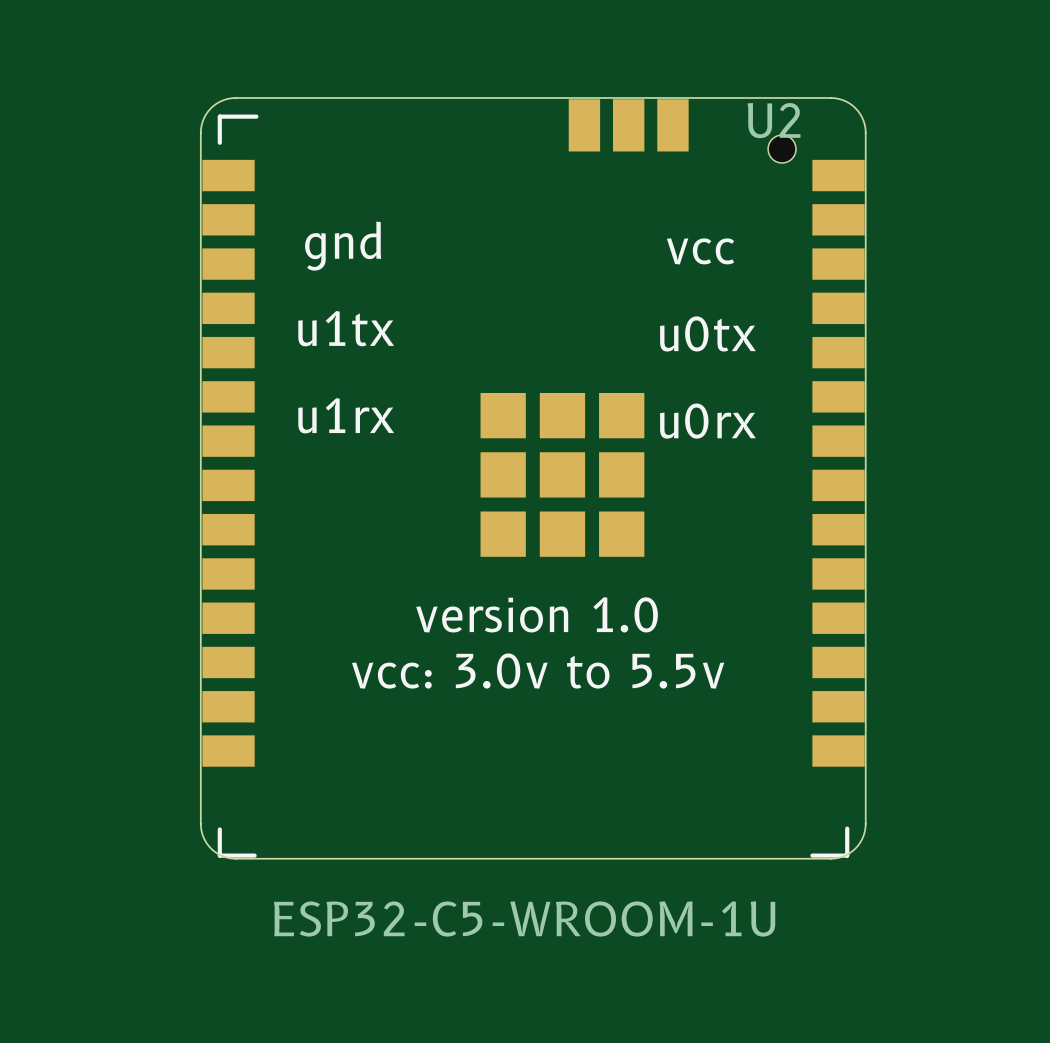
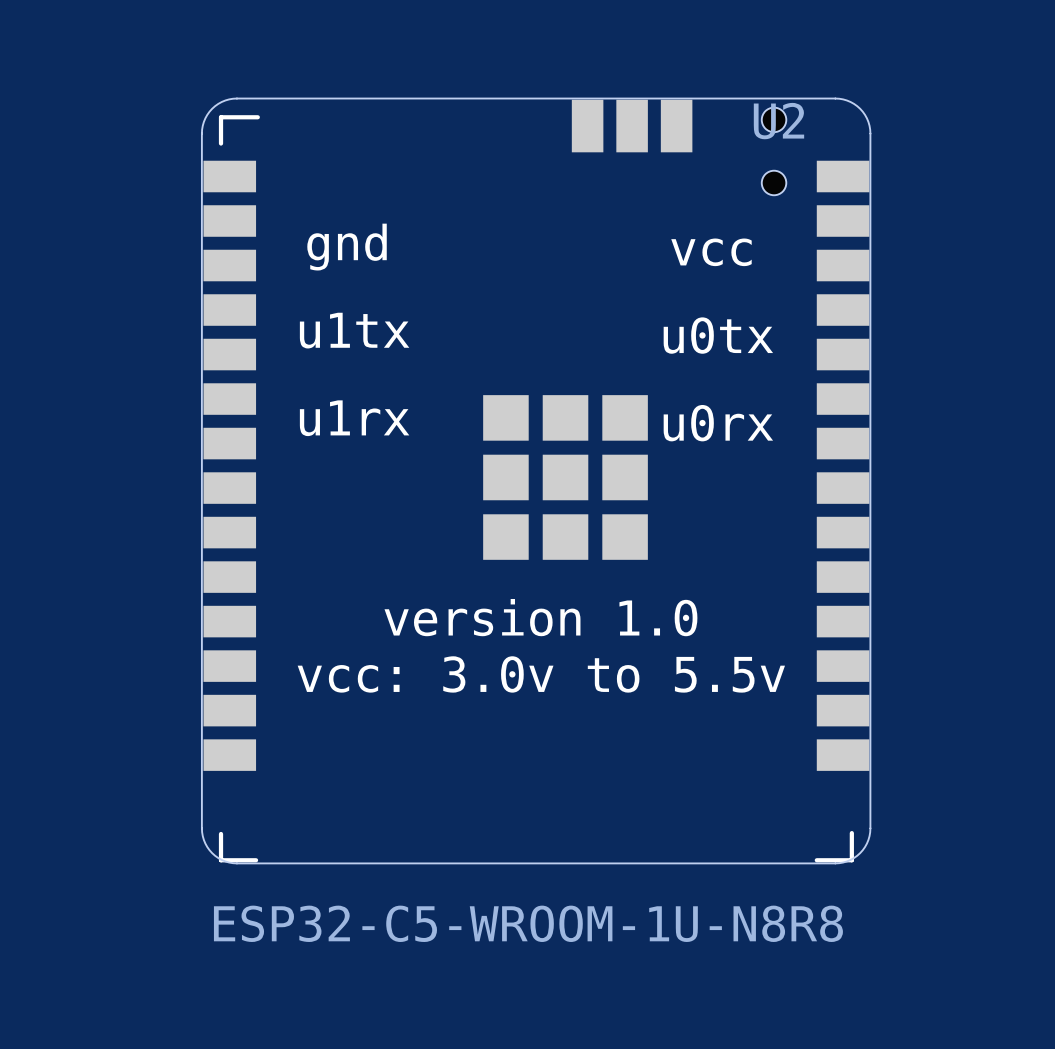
part footprint: [768, 135, 797, 164] -> [761, 107, 787, 196]
U2 value: ESP32-C5-WROOM-1U (524, 918) -> ESP32-C5-WROOM-1U-N8R8 (528, 923)

